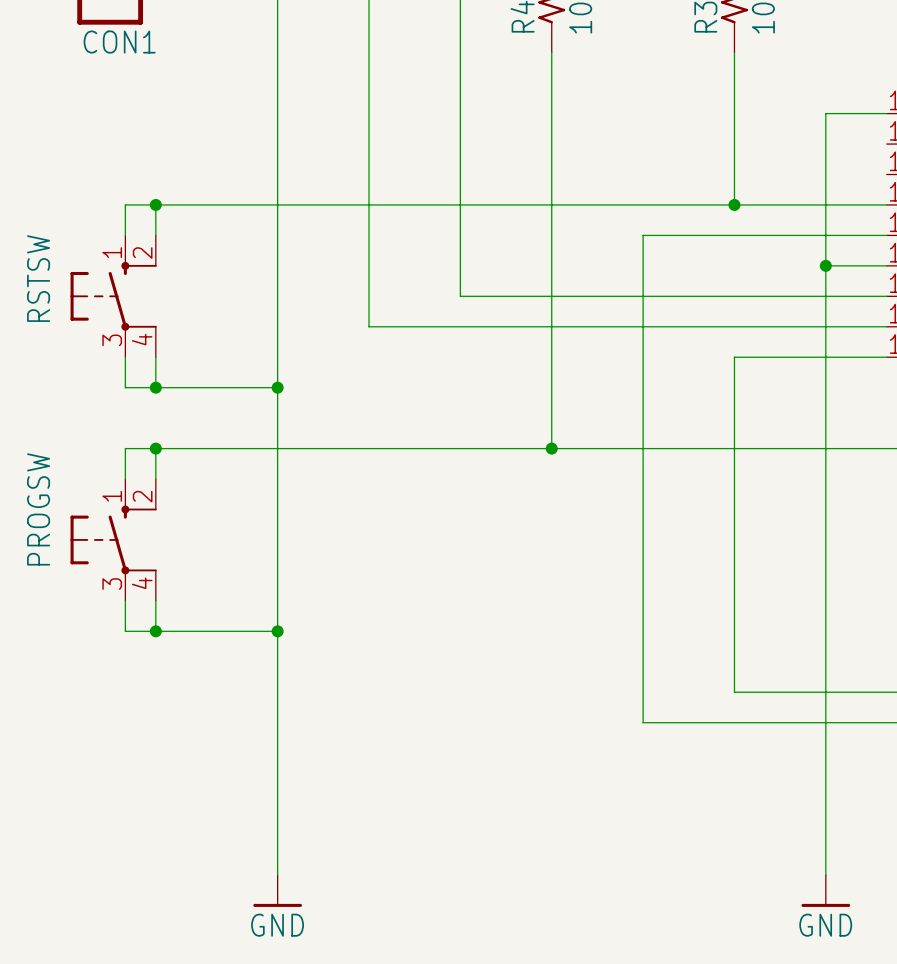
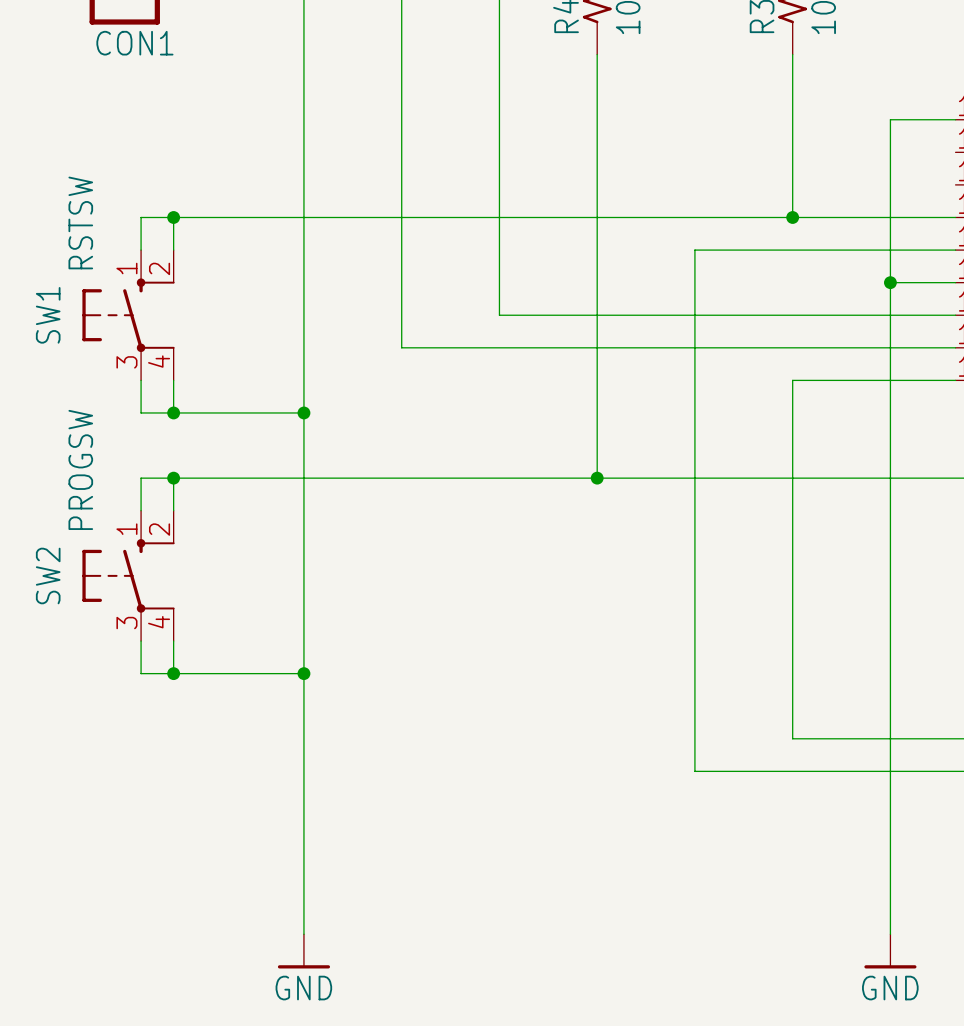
RSTSW value: none -> RSTSW (80, 222)
RSTSW name: RSTSW (38, 278) -> SW1 (48, 315)
PROGSW value: none -> PROGSW (80, 469)
PROGSW name: PROGSW (38, 509) -> SW2 (48, 575)

